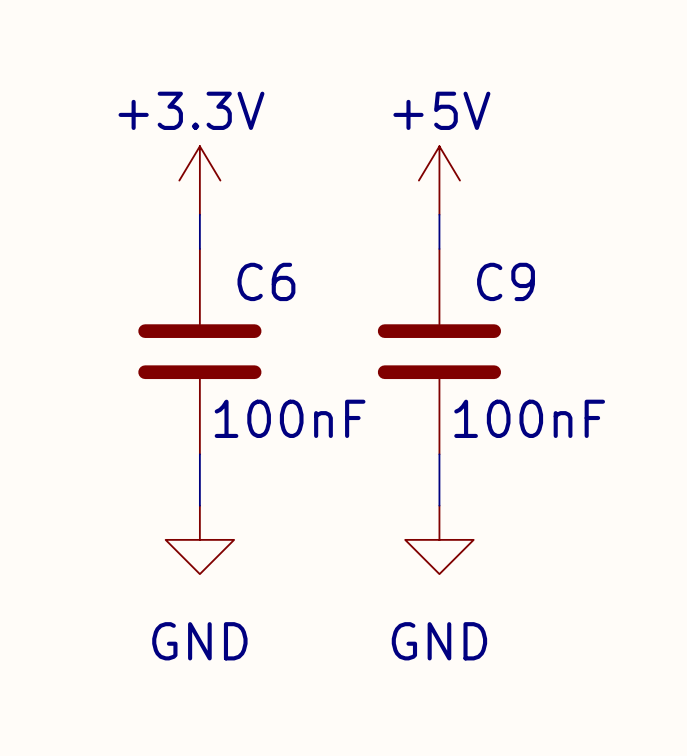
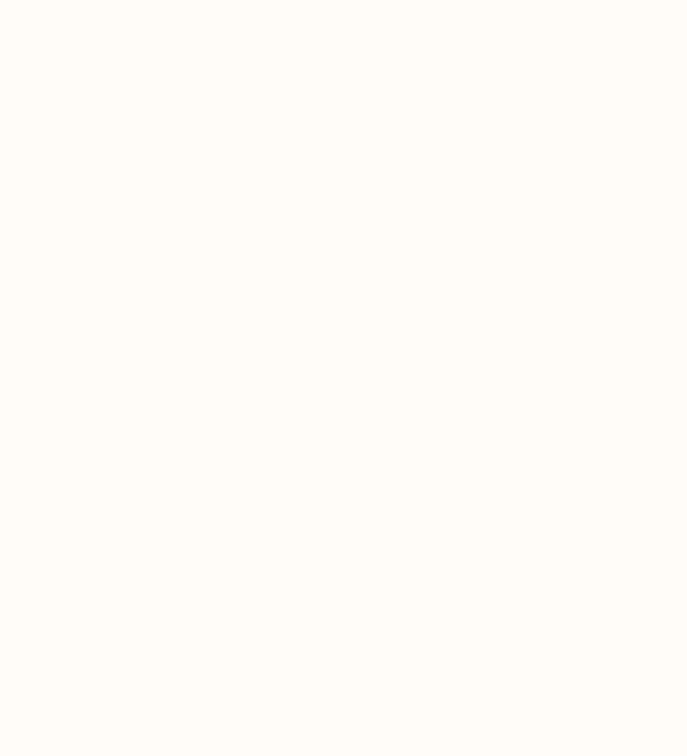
power symbol: +3.3V (199, 180) -> none
power symbol: +5V (439, 180) -> none
wire: (199, 214) (199, 248) -> none
wire: (439, 214) (439, 248) -> none
C6: 100nF (199, 351) -> none
C9: 100nF (439, 351) -> none
wire: (199, 454) (199, 505) -> none
wire: (439, 454) (439, 505) -> none
power symbol: GND (199, 539) -> none
power symbol: GND (439, 539) -> none

